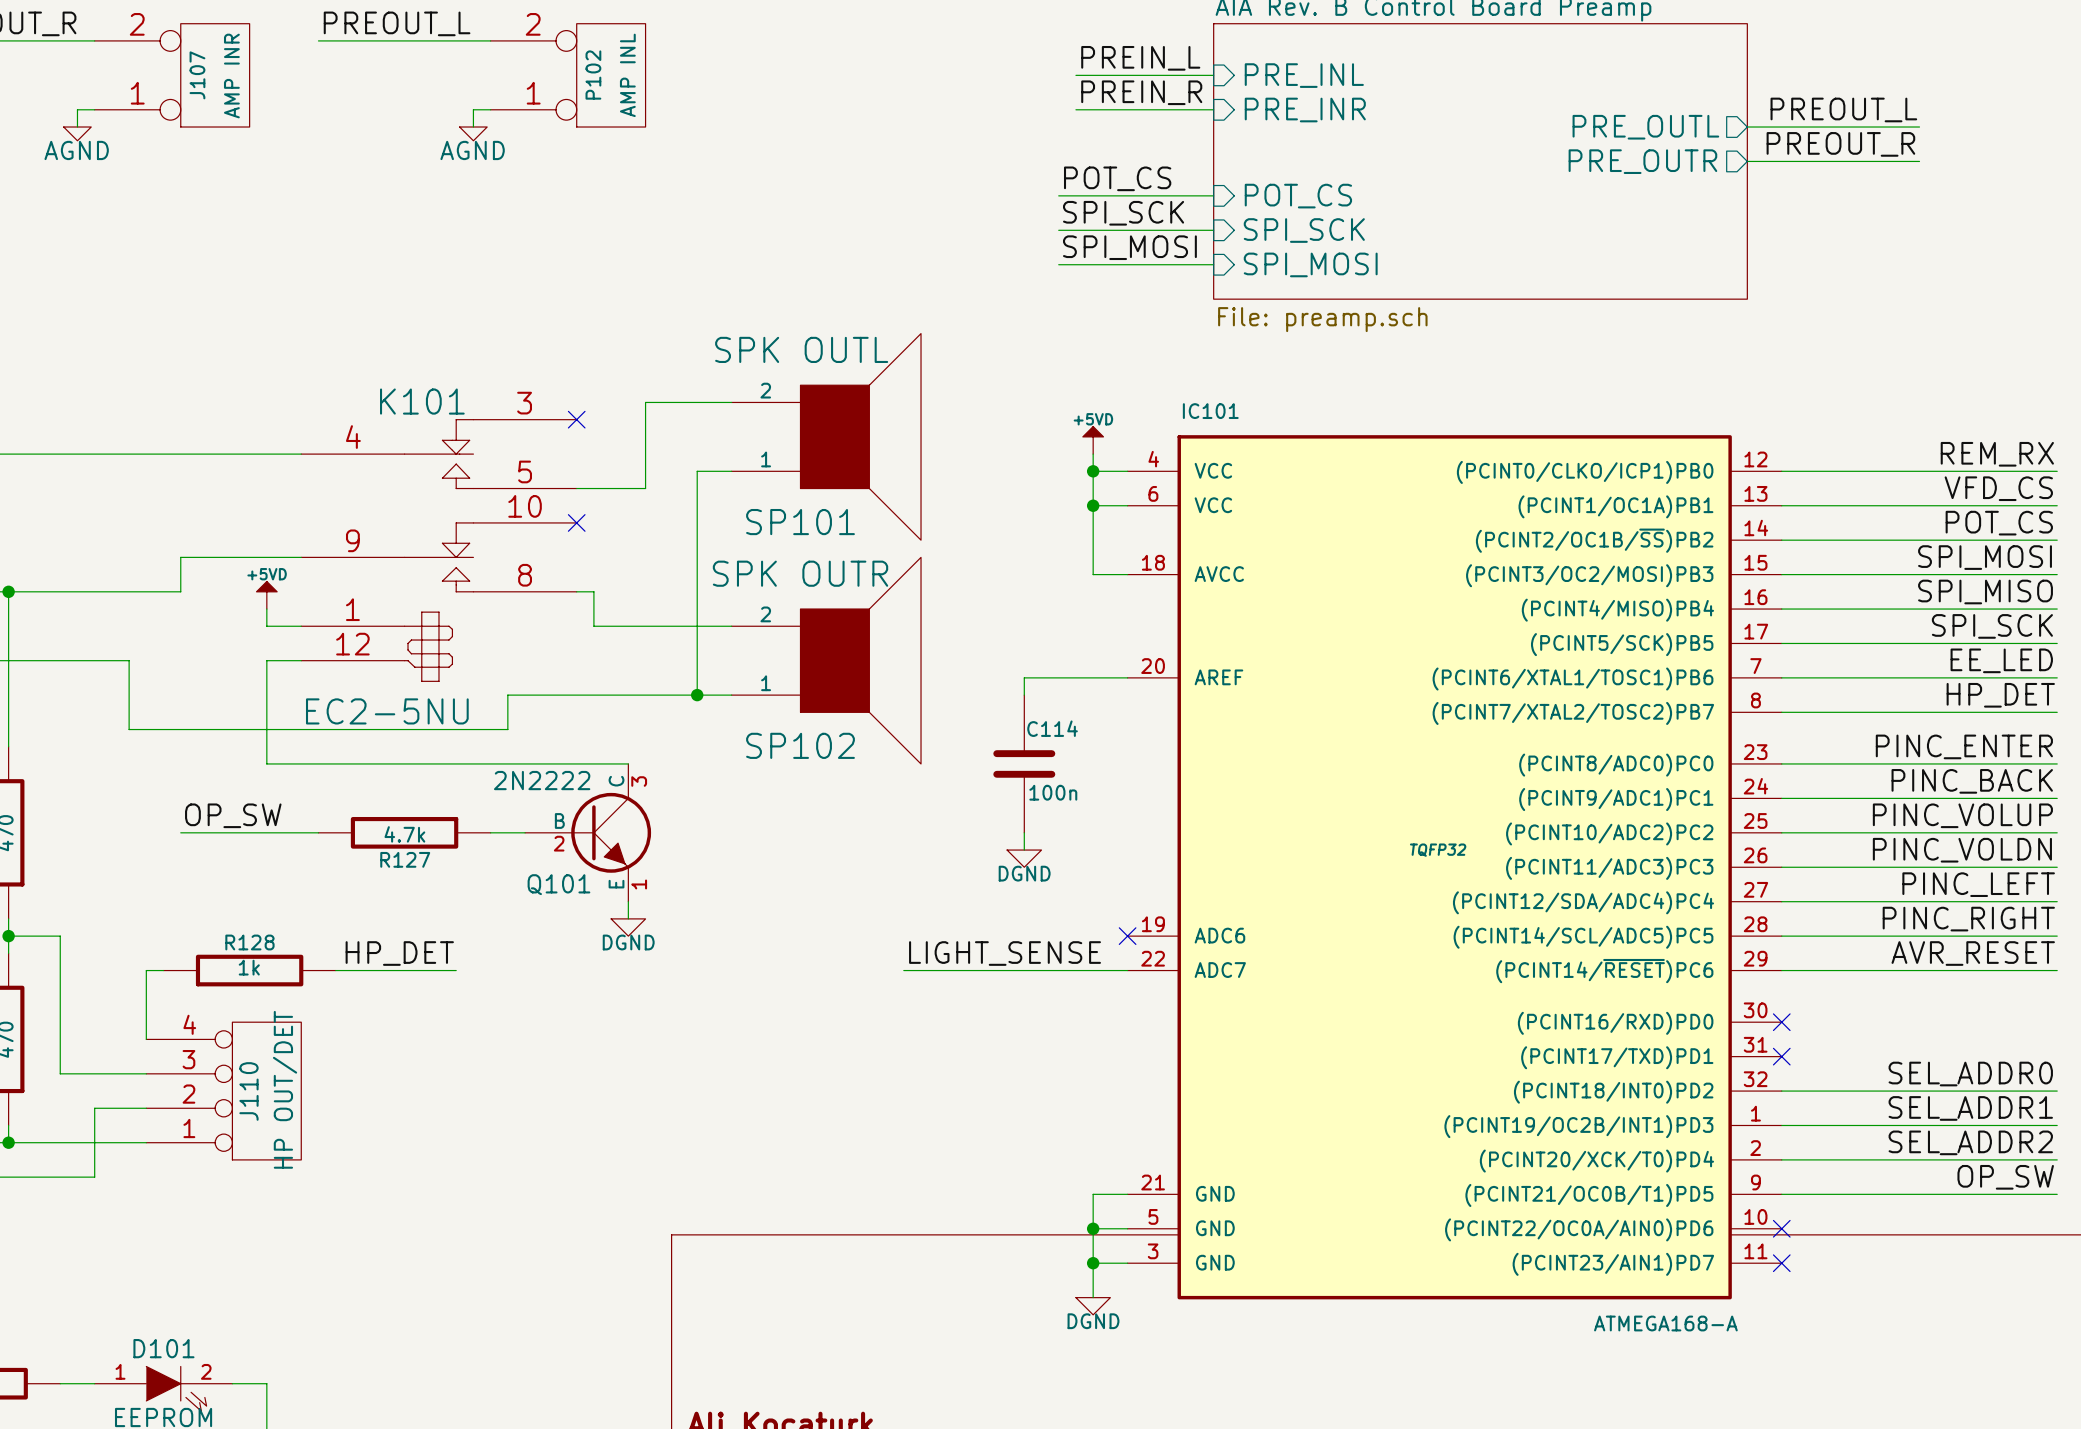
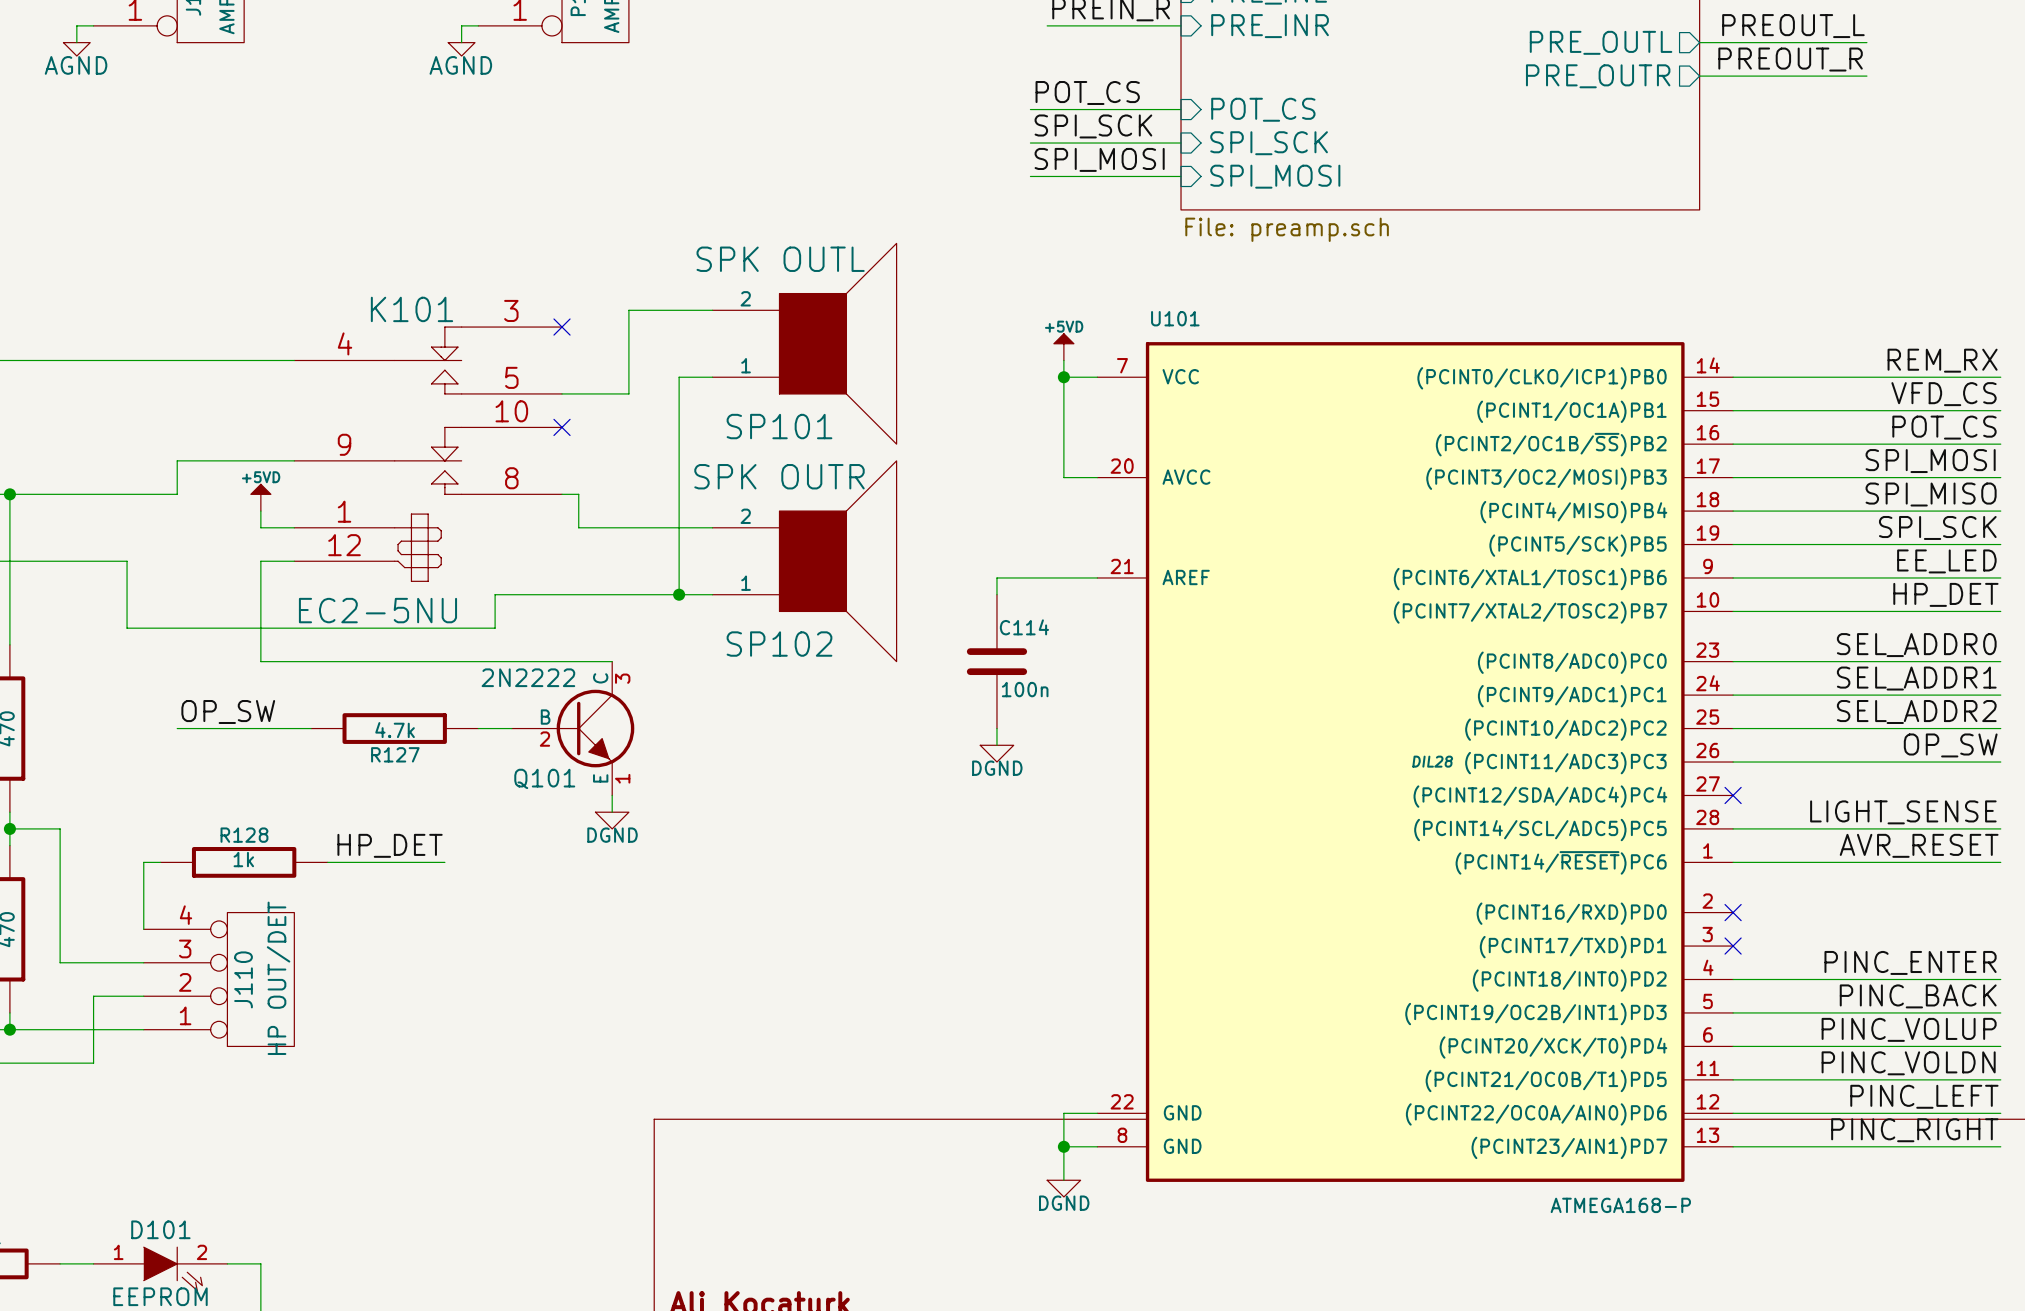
wire: (1093, 505) (1127, 505) -> none
junction: (1093, 505) -> none
label: PINC_ENTER (1964, 746) -> SEL_ADDR0 (1916, 645)
label: PINC_BACK (1972, 781) -> SEL_ADDR1 (1916, 678)
label: PINC_VOLUP (1962, 815) -> SEL_ADDR2 (1916, 711)
label: PINC_VOLDN (1962, 850) -> OP_SW (1950, 745)
IC101: ATMEGA168-A (1454, 867) -> none
U101: none -> ATMEGA168-P (1415, 762)
label position: PINC_LEFT (1978, 884) -> PINC_LEFT (1924, 1096)
wire: (1781, 901) (2057, 901) -> (1733, 1113) (2000, 1113)
no-connect mark: none -> (1733, 795)
label: PINC_RIGHT (1968, 919) -> LIGHT_SENSE (1903, 812)
no-connect mark: (1127, 936) -> none
label: LIGHT_SENSE (1005, 953) -> none
wire: (903, 970) (1127, 970) -> none
label: SEL_ADDR0 (1970, 1074) -> PINC_ENTER (1910, 962)
label: SEL_ADDR1 (1970, 1108) -> PINC_BACK (1918, 996)
label: SEL_ADDR2 (1970, 1142) -> PINC_VOLUP (1909, 1029)
label: OP_SW (2005, 1177) -> PINC_VOLDN (1908, 1063)
wire: (1127, 1194) (1093, 1194) (1093, 1228) -> none
junction: (1093, 1228) -> none
no-connect mark: (1781, 1228) -> none
label: none -> PINC_RIGHT (1914, 1130)
wire: none -> (1733, 1146) (2000, 1146)
no-connect mark: (1781, 1263) -> none

